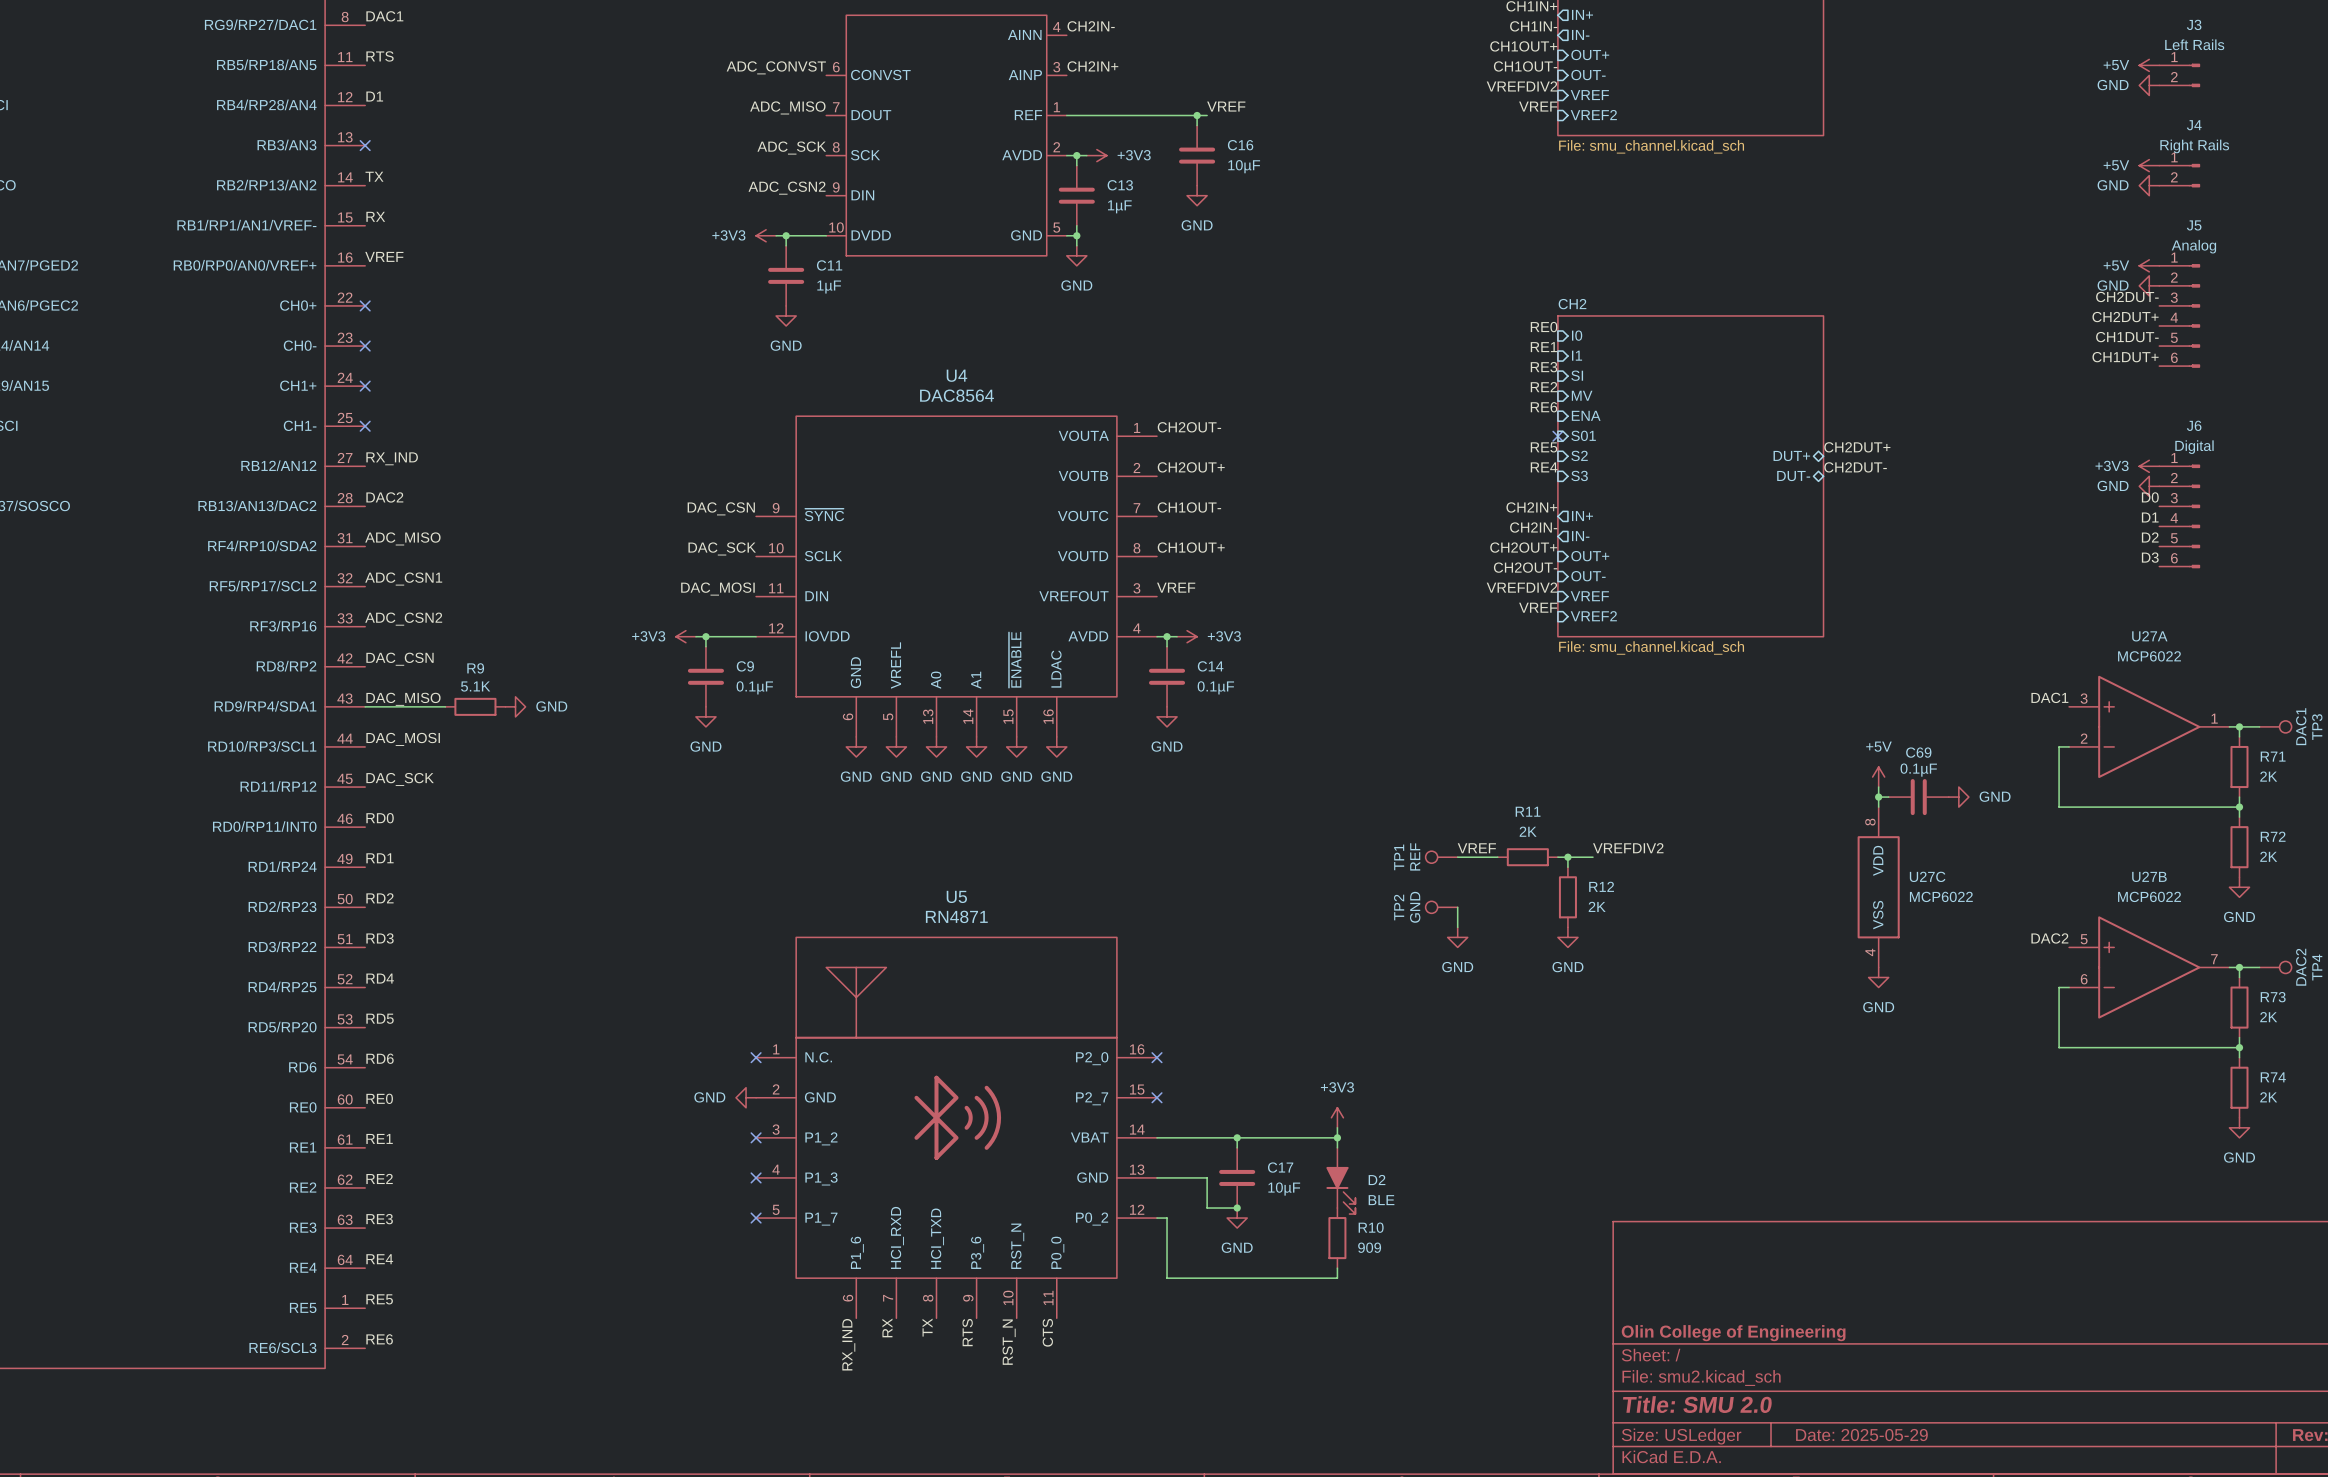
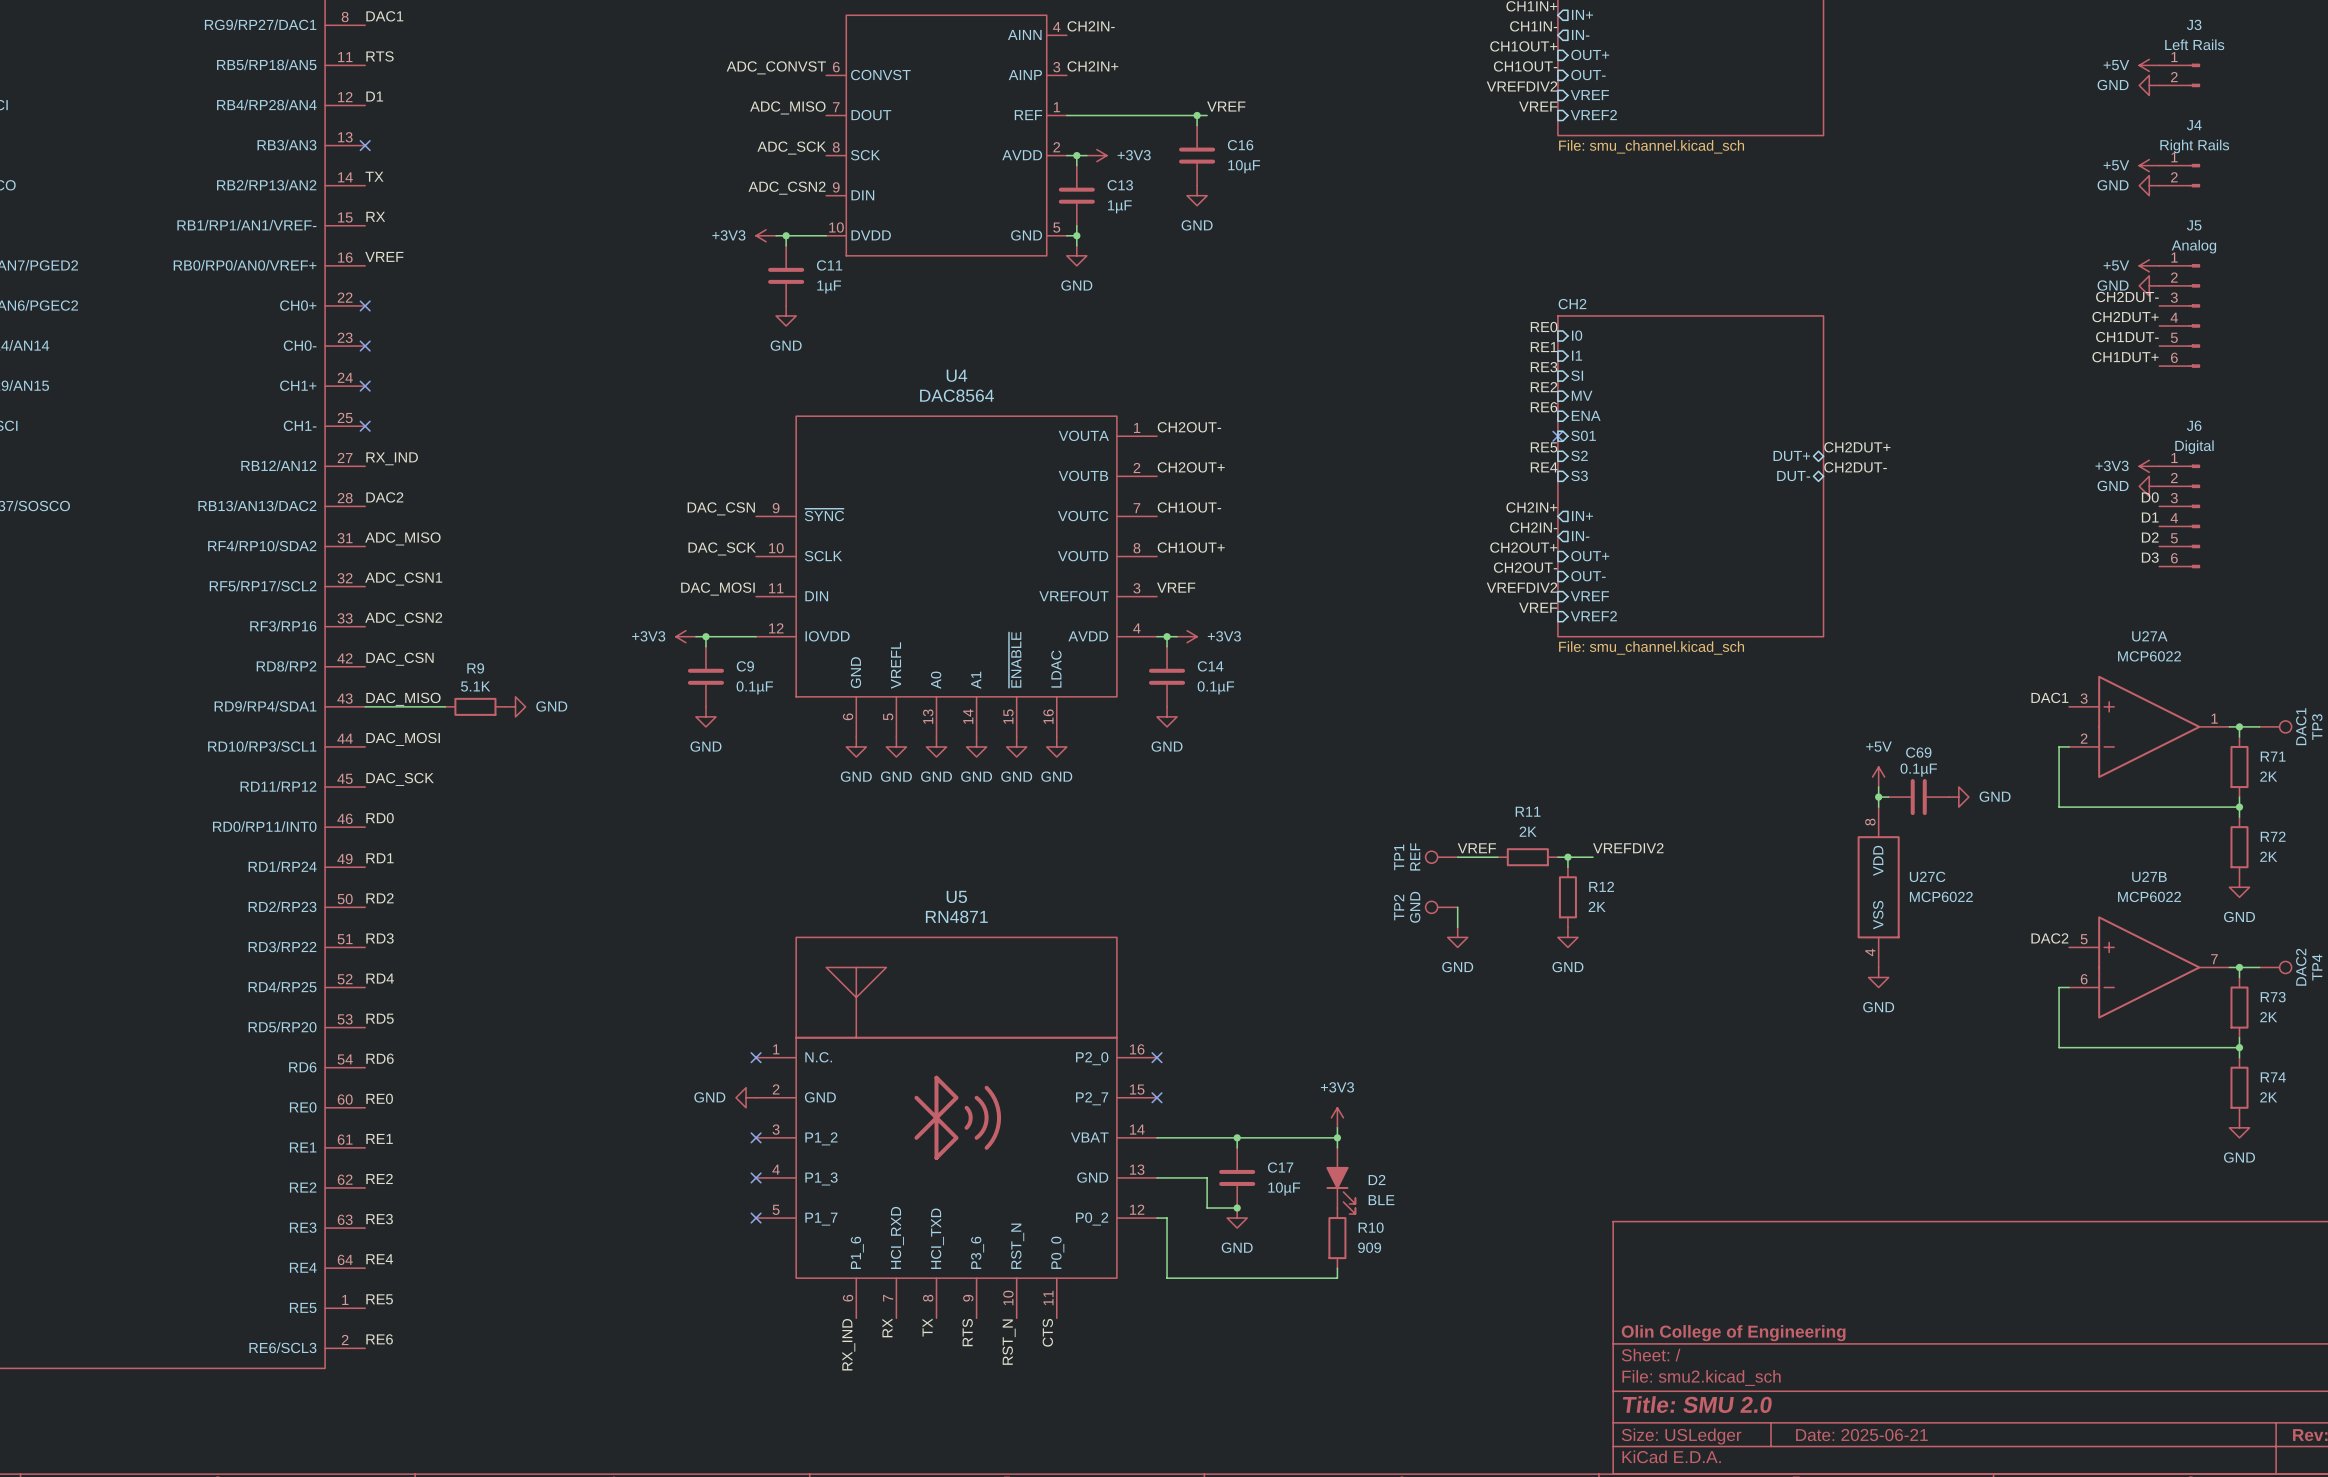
title block: Date: 2025-05-29 (1861, 1435) -> Date: 2025-06-21 (1861, 1435)

